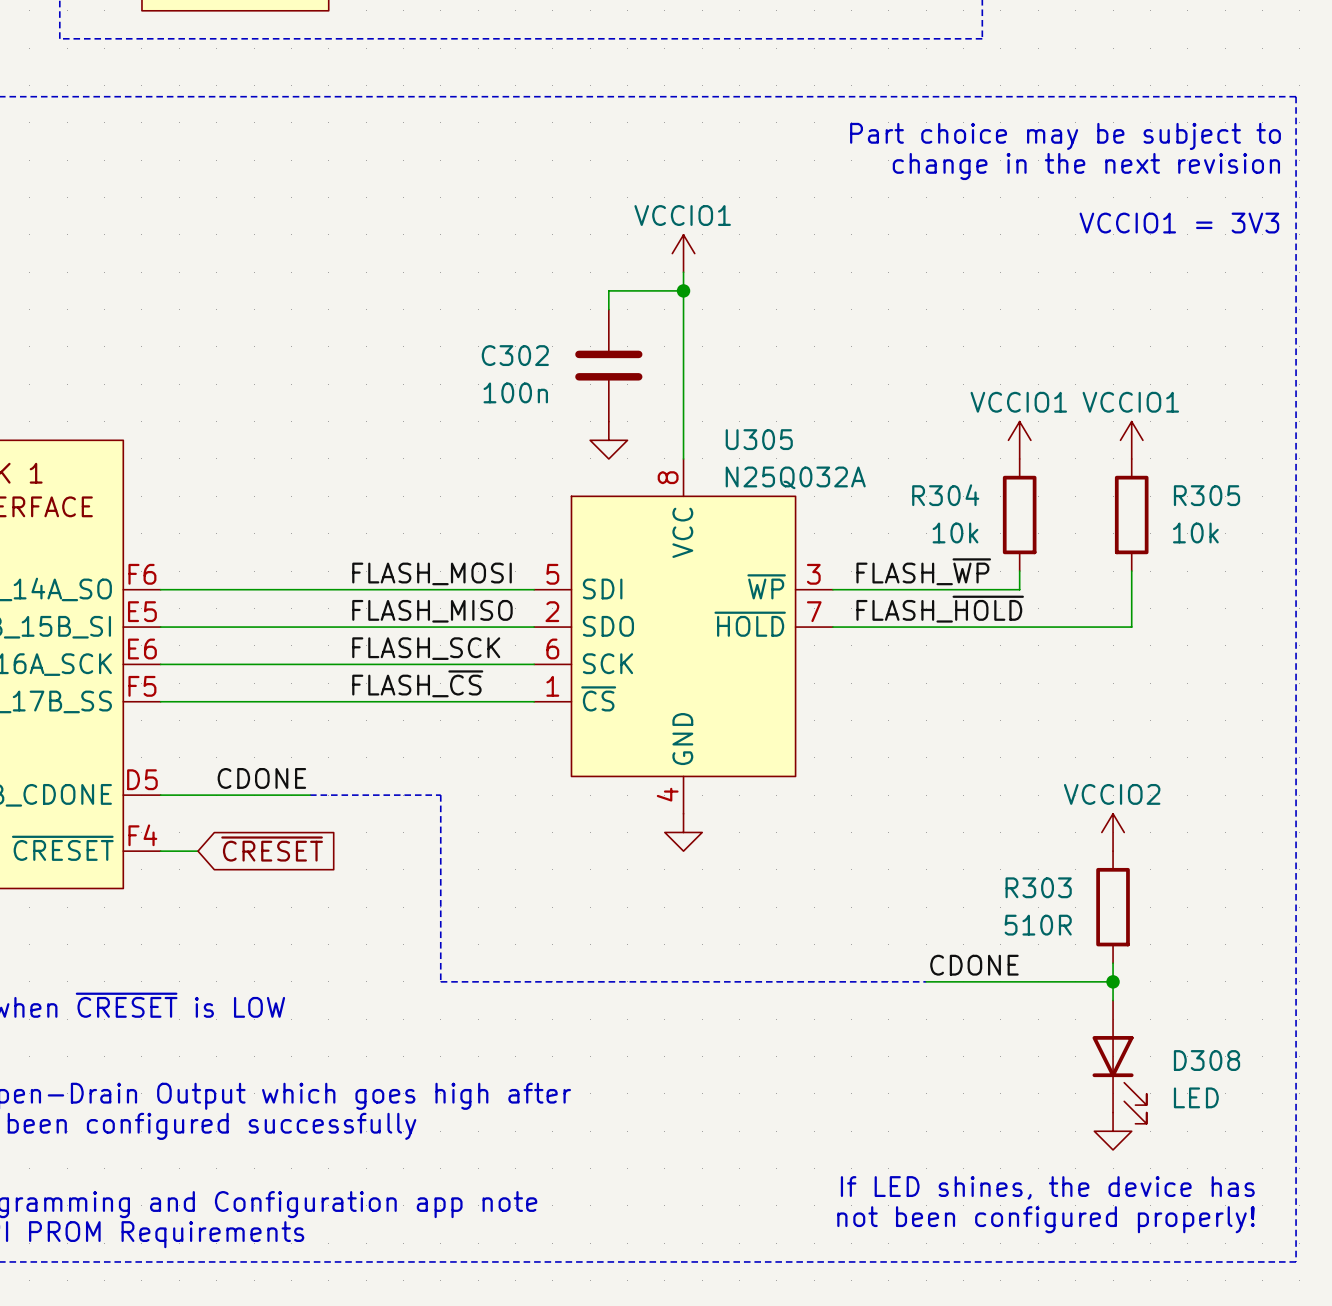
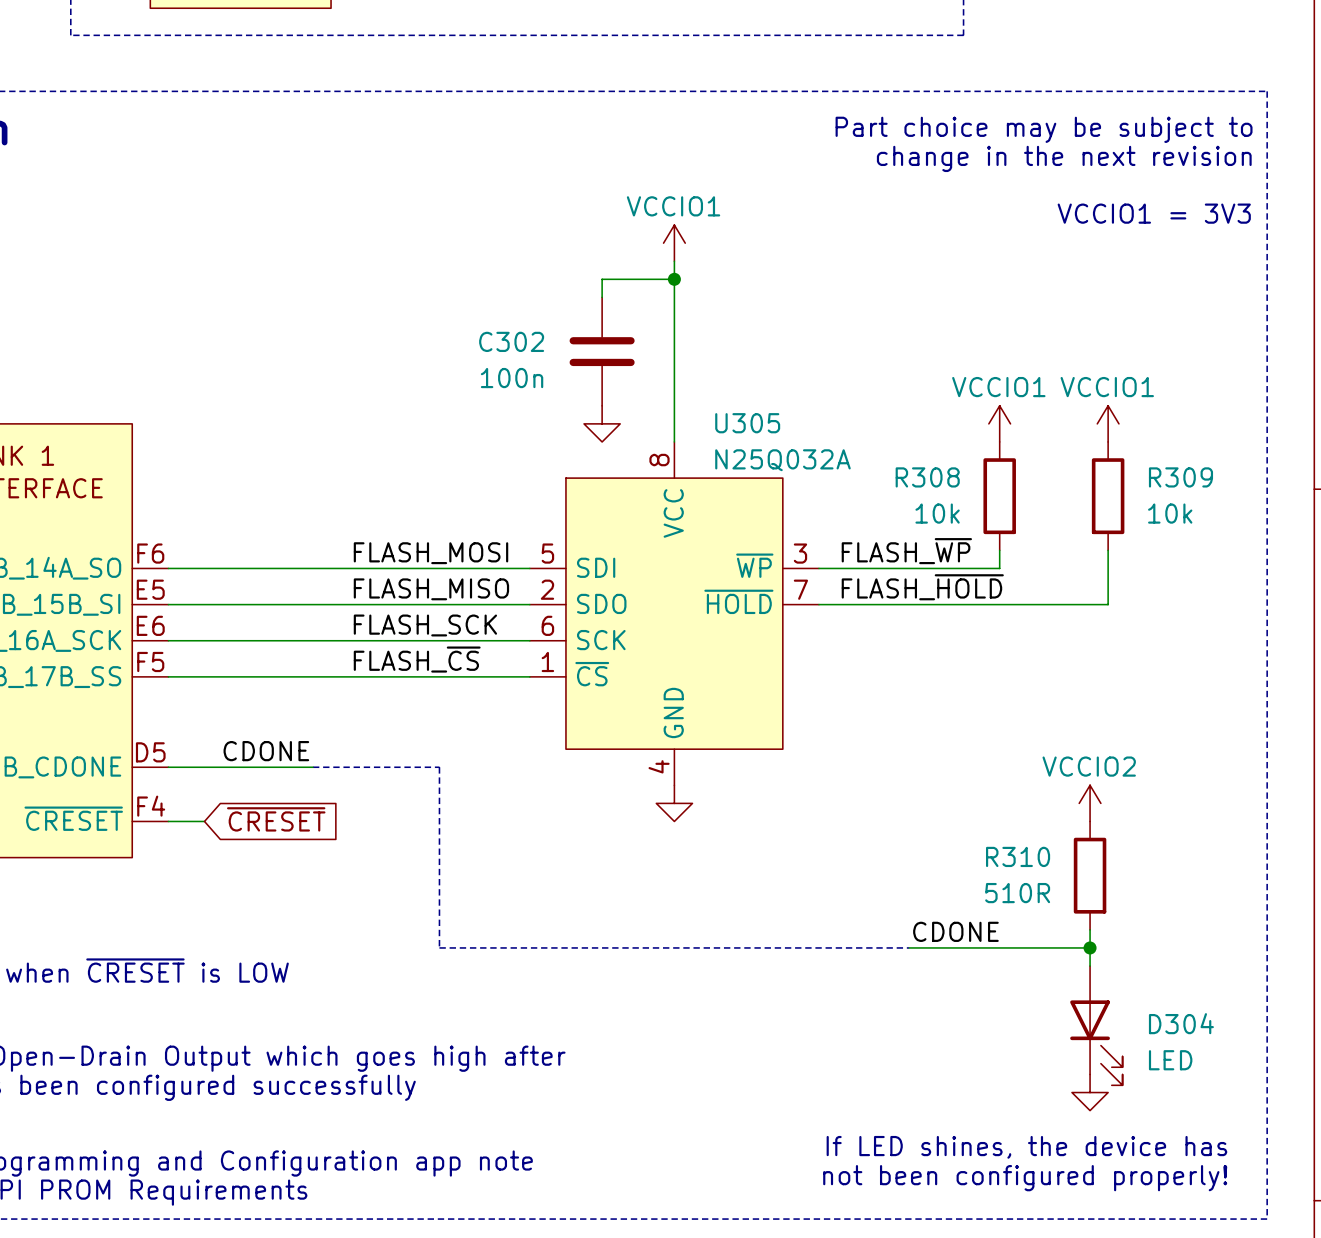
R304 name: R304 (945, 495) -> R308 (927, 477)
R305 name: R305 (1206, 495) -> R309 (1180, 477)
R303 name: R303 (1038, 887) -> R310 (1018, 856)
D308 name: D308 (1206, 1060) -> D304 (1181, 1023)

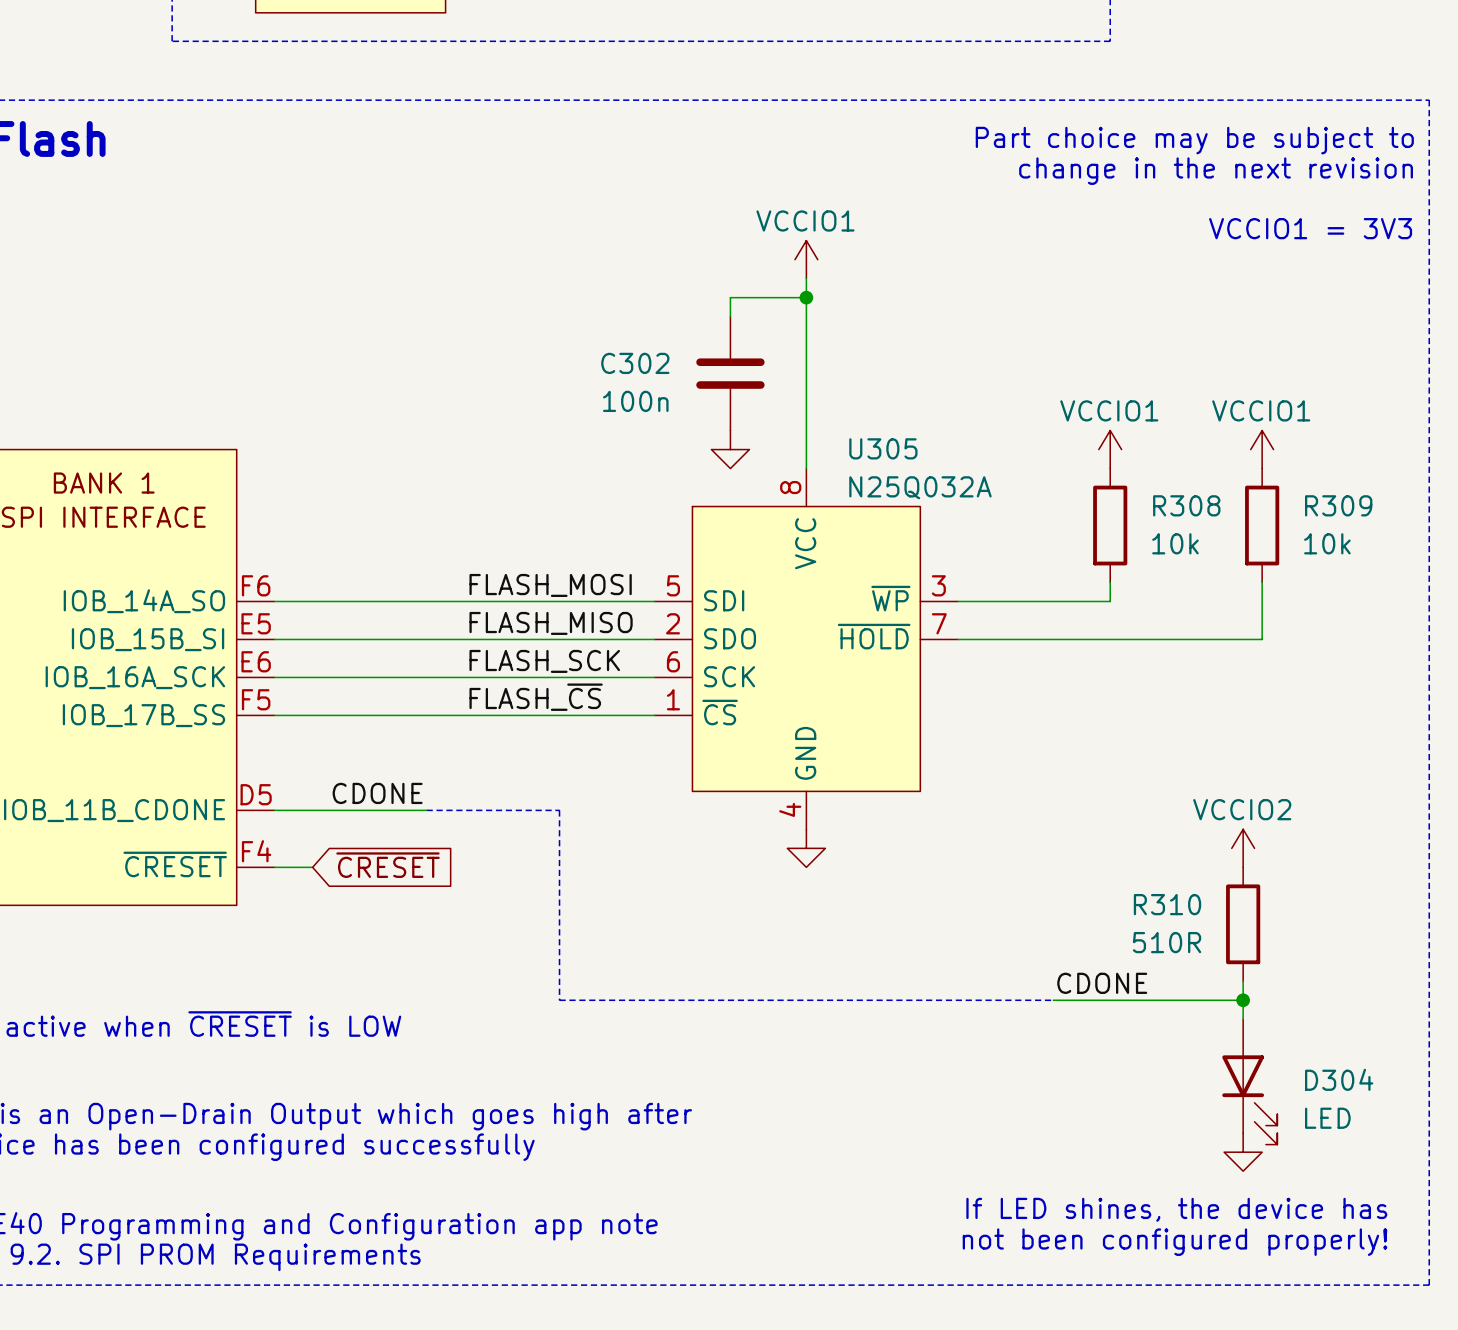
power symbol position: VCCIO1 (999, 423) -> VCCIO1 (1110, 449)
R308 name position: R308 (927, 477) -> R308 (1186, 505)
R308 position: (999, 496) -> (1110, 525)
R308 value position: 10k (937, 513) -> 10k (1175, 543)
wire: (999, 550) (999, 568) (963, 568) -> (1110, 582) (1110, 601)
label: FLASH_~{WP} (906, 551) -> none
label: FLASH_~{HOLD} (922, 587) -> none

